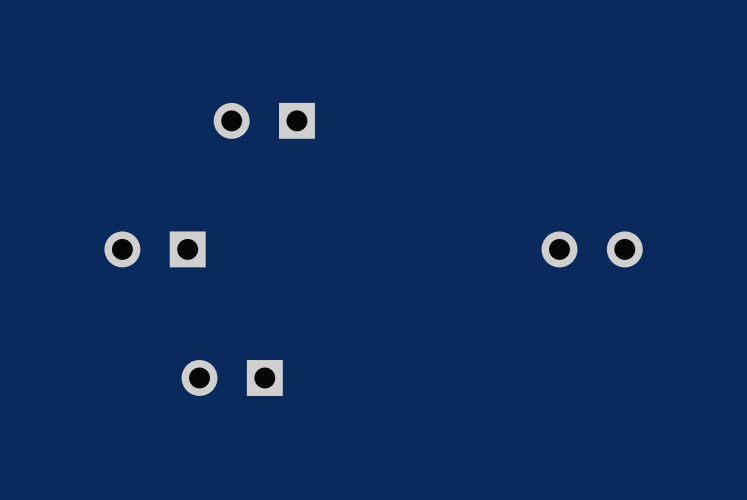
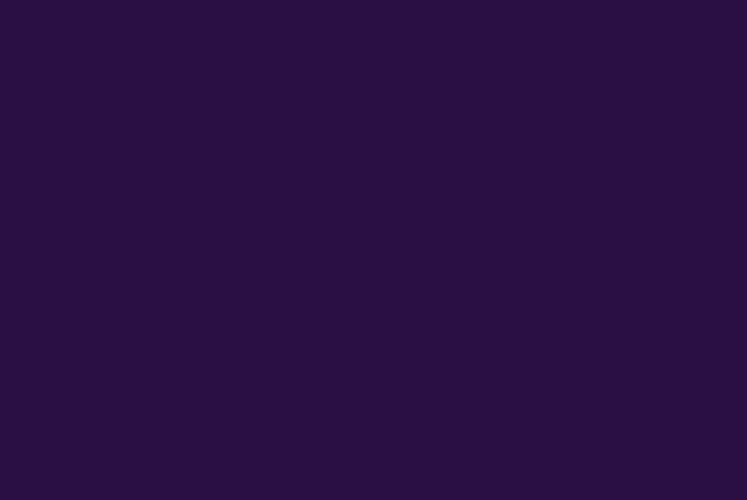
part: (264, 120) -> none
part: (155, 249) -> none
part: (592, 249) -> none
part: (232, 377) -> none

